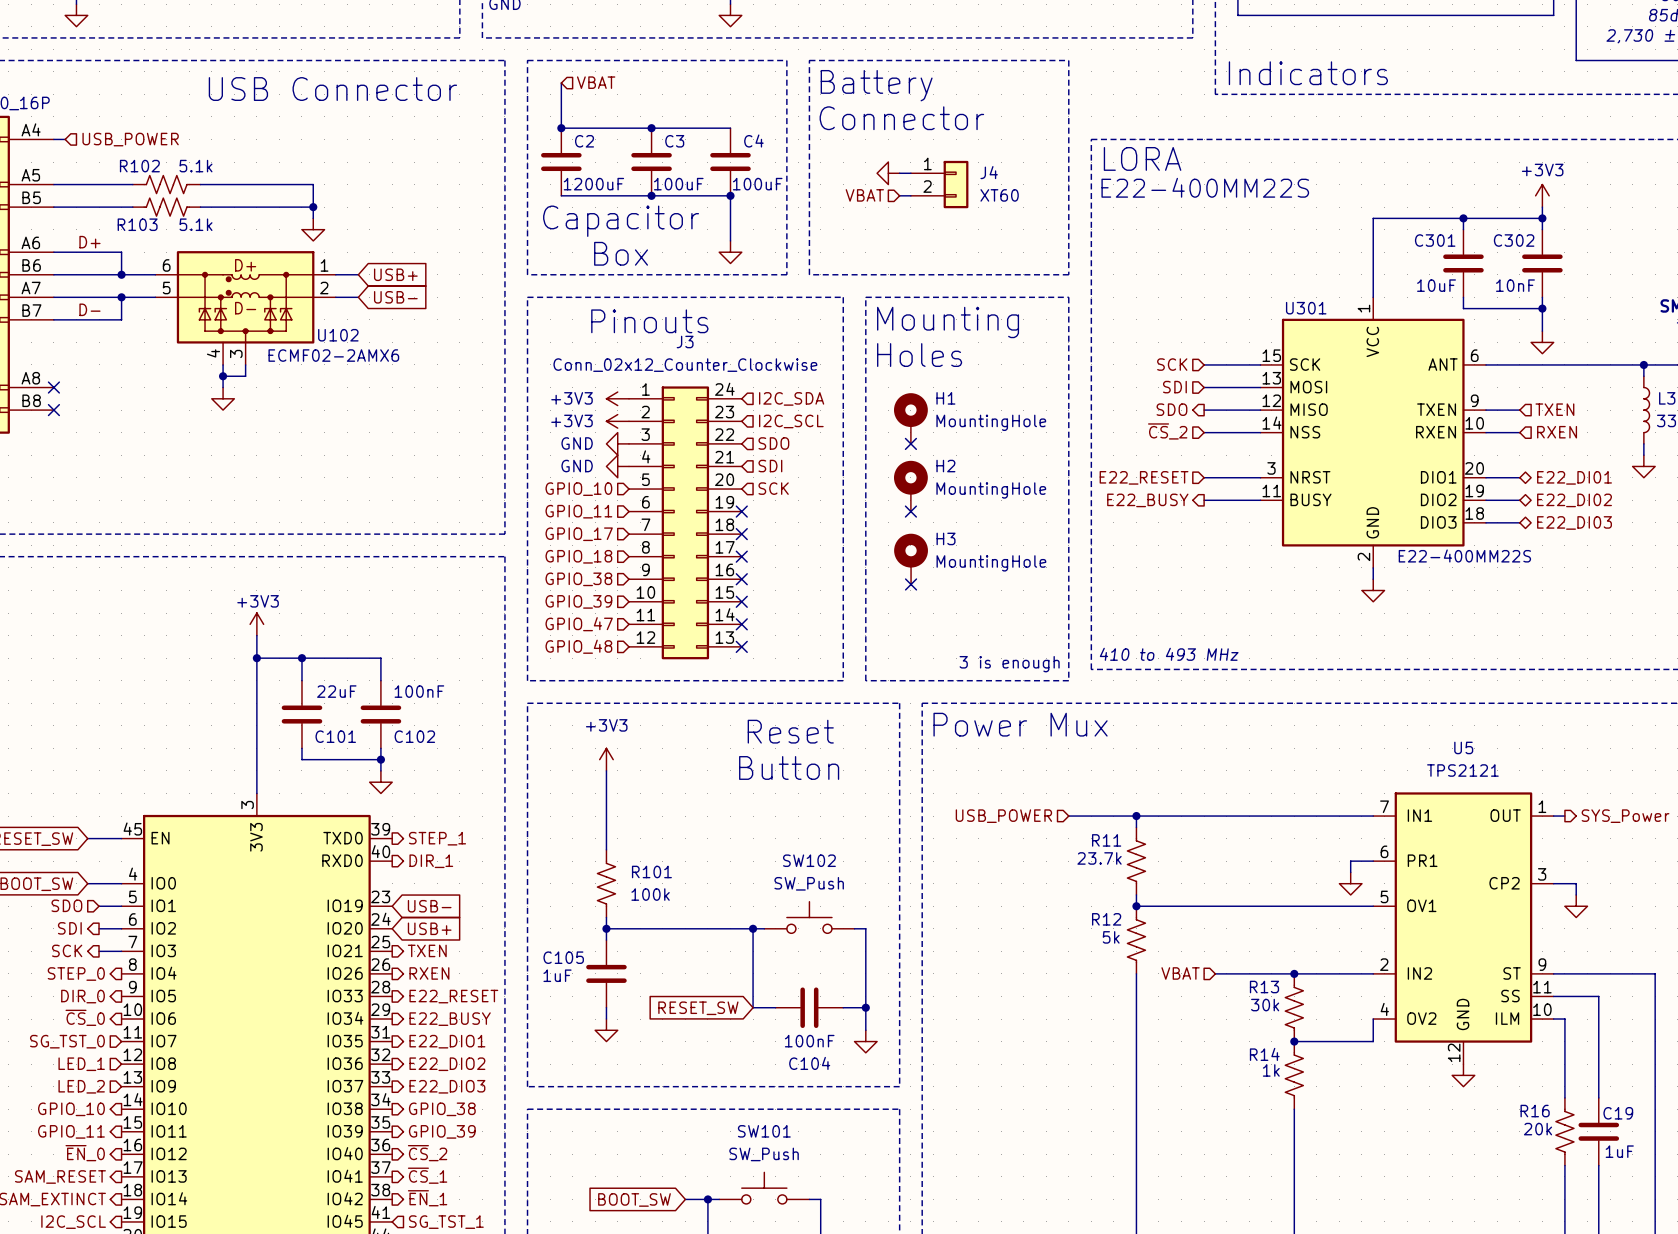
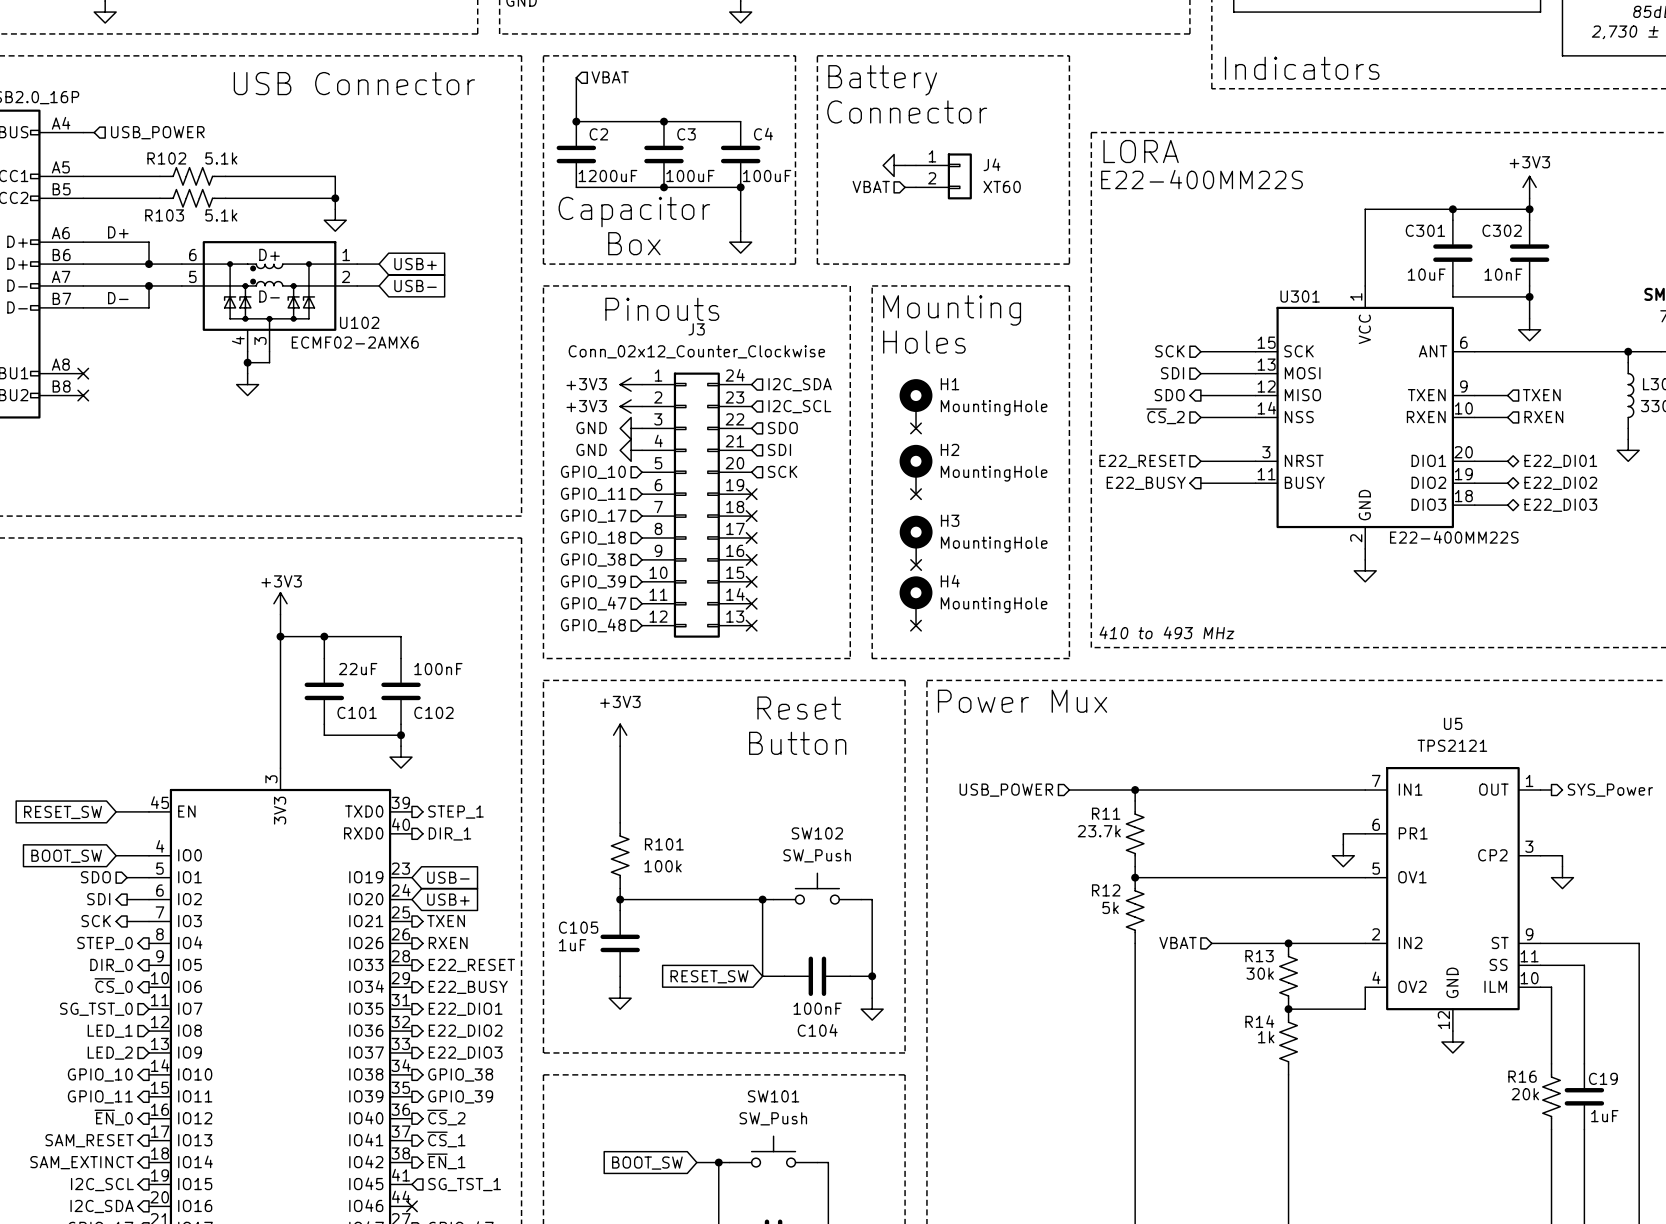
H4: none -> MountingHole (916, 600)
no-connect mark: none -> (916, 625)
text: 3 is enough (1009, 664) -> none

